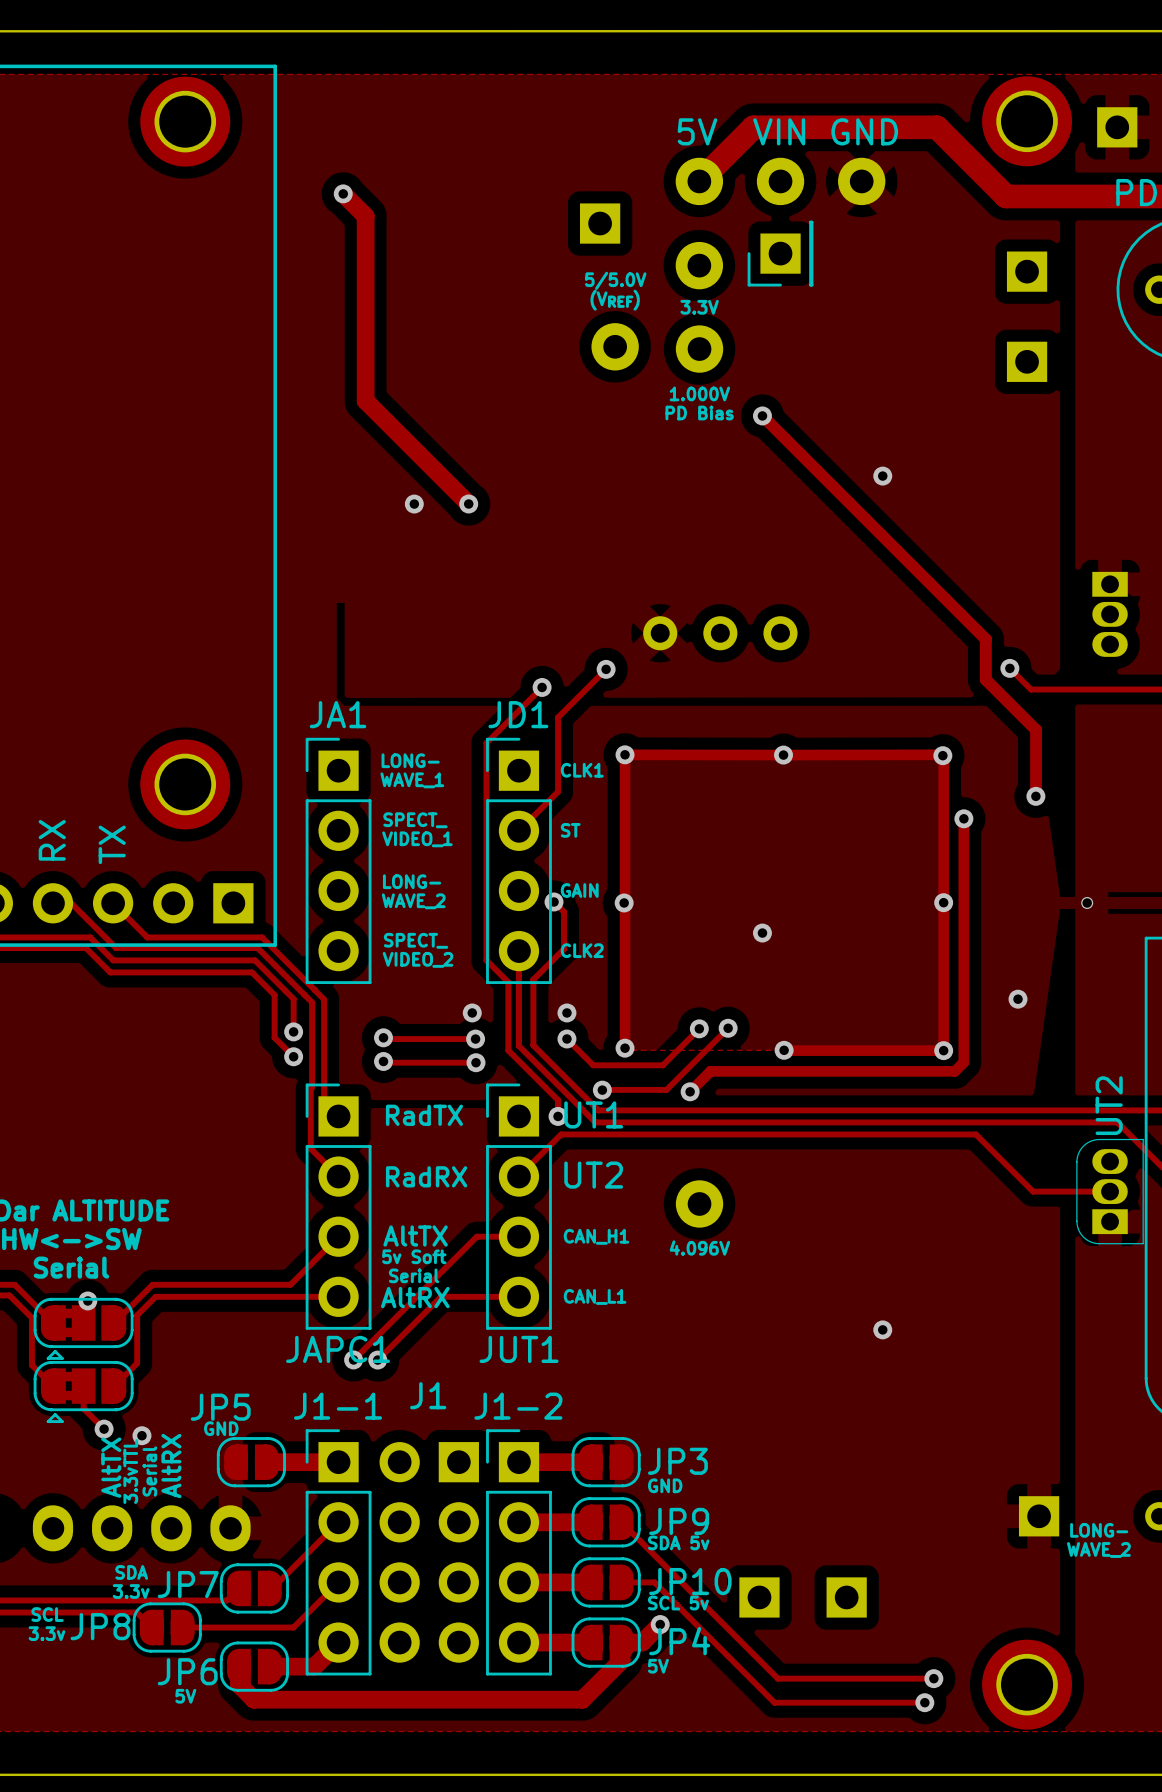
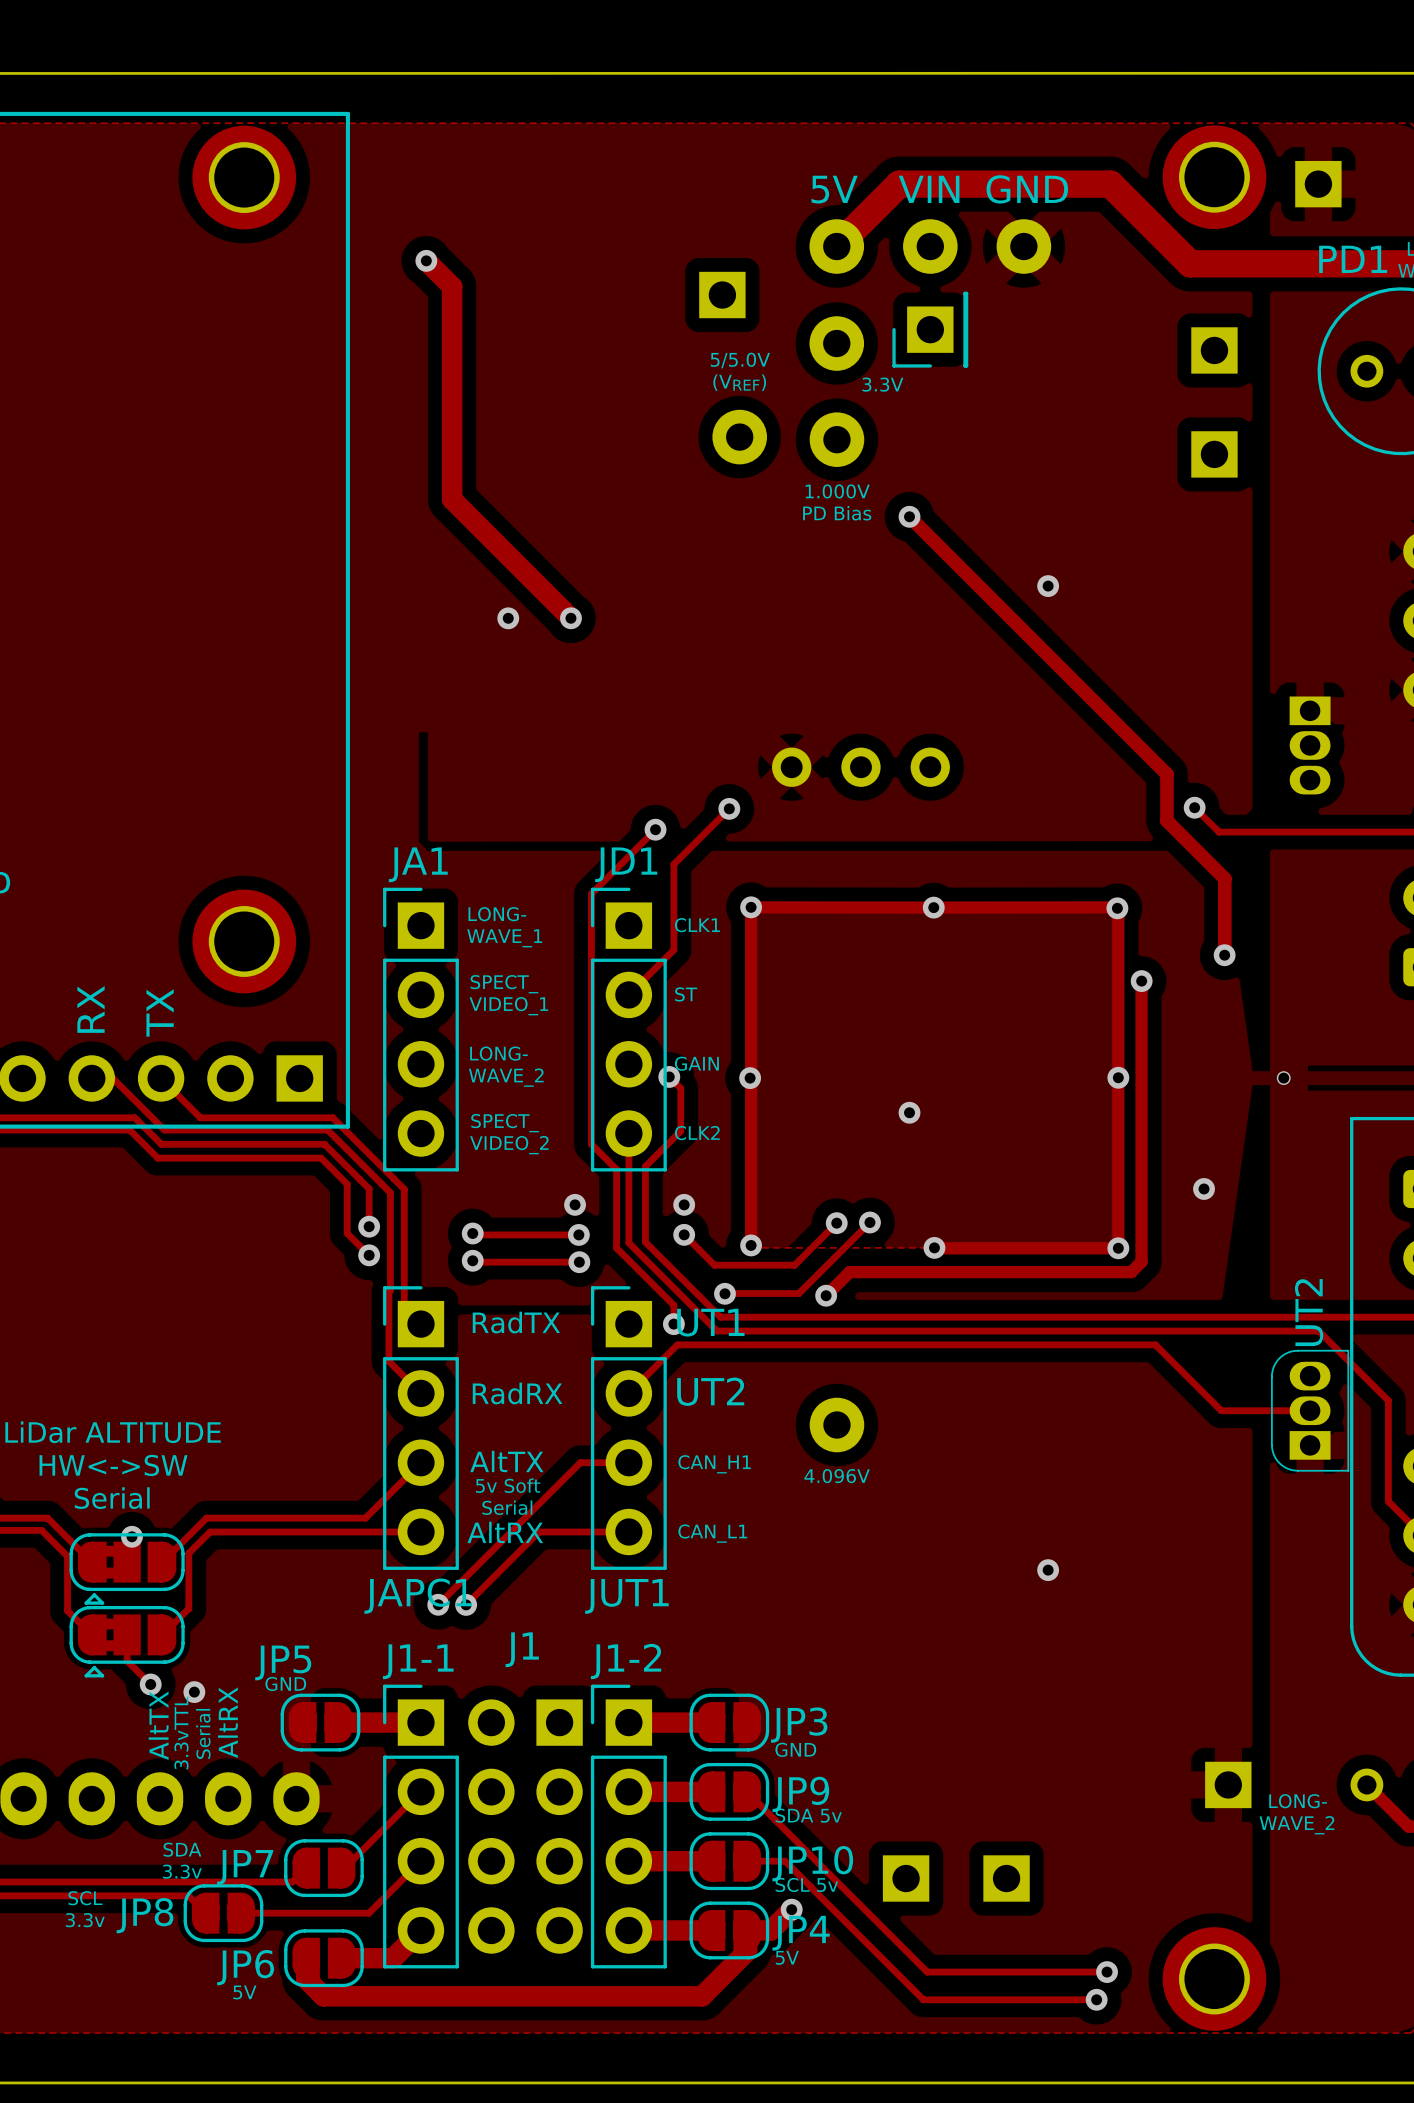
text position: 3.3V (699, 307) -> 3.3V (882, 384)

